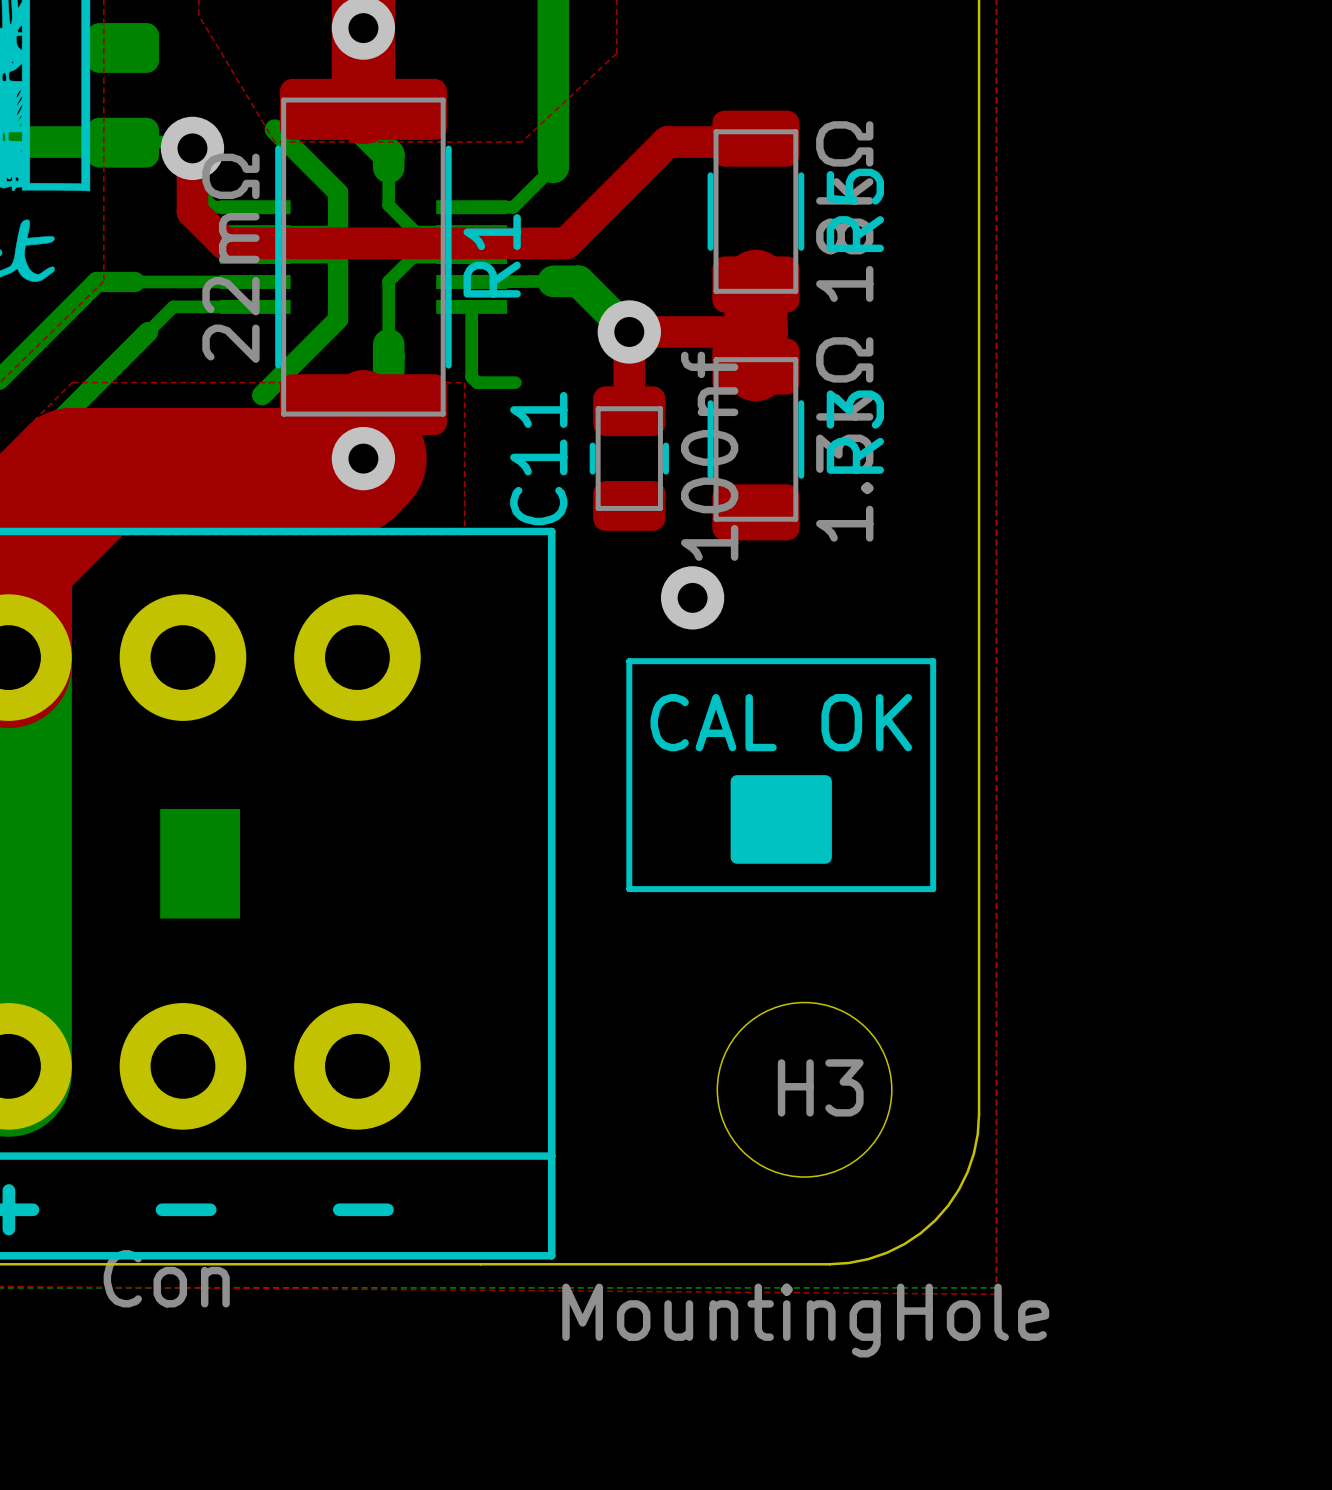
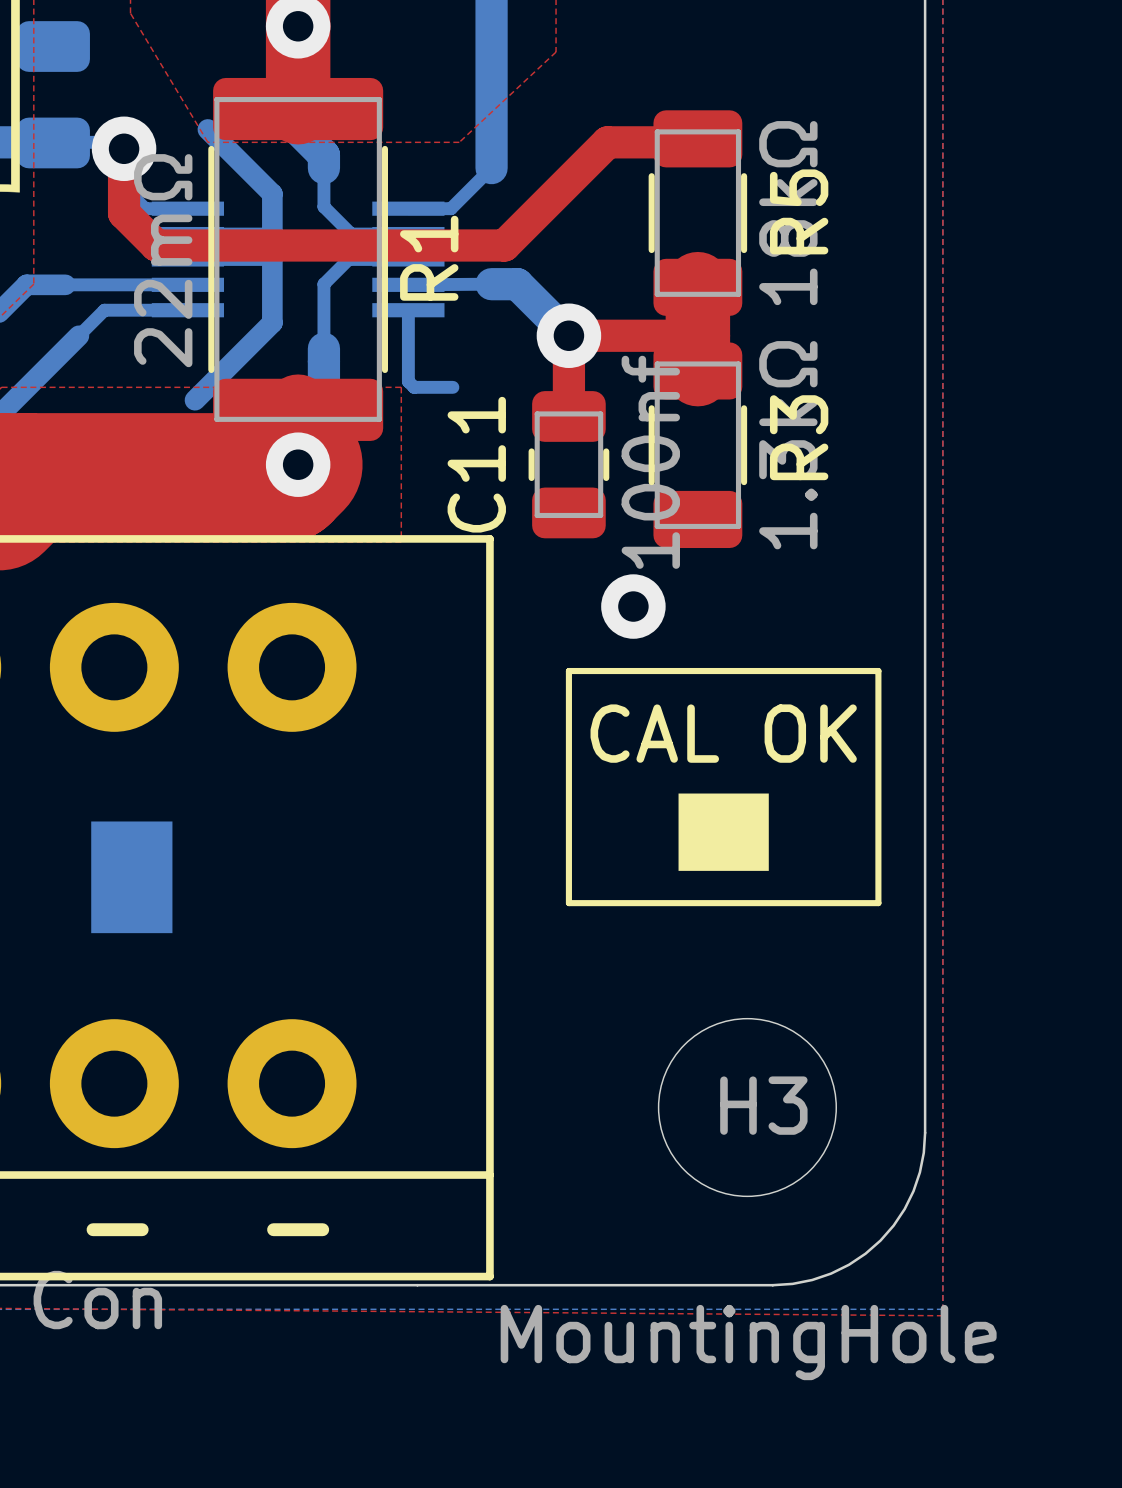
drawing shape: [730, 775, 832, 864] -> [678, 793, 769, 871]

